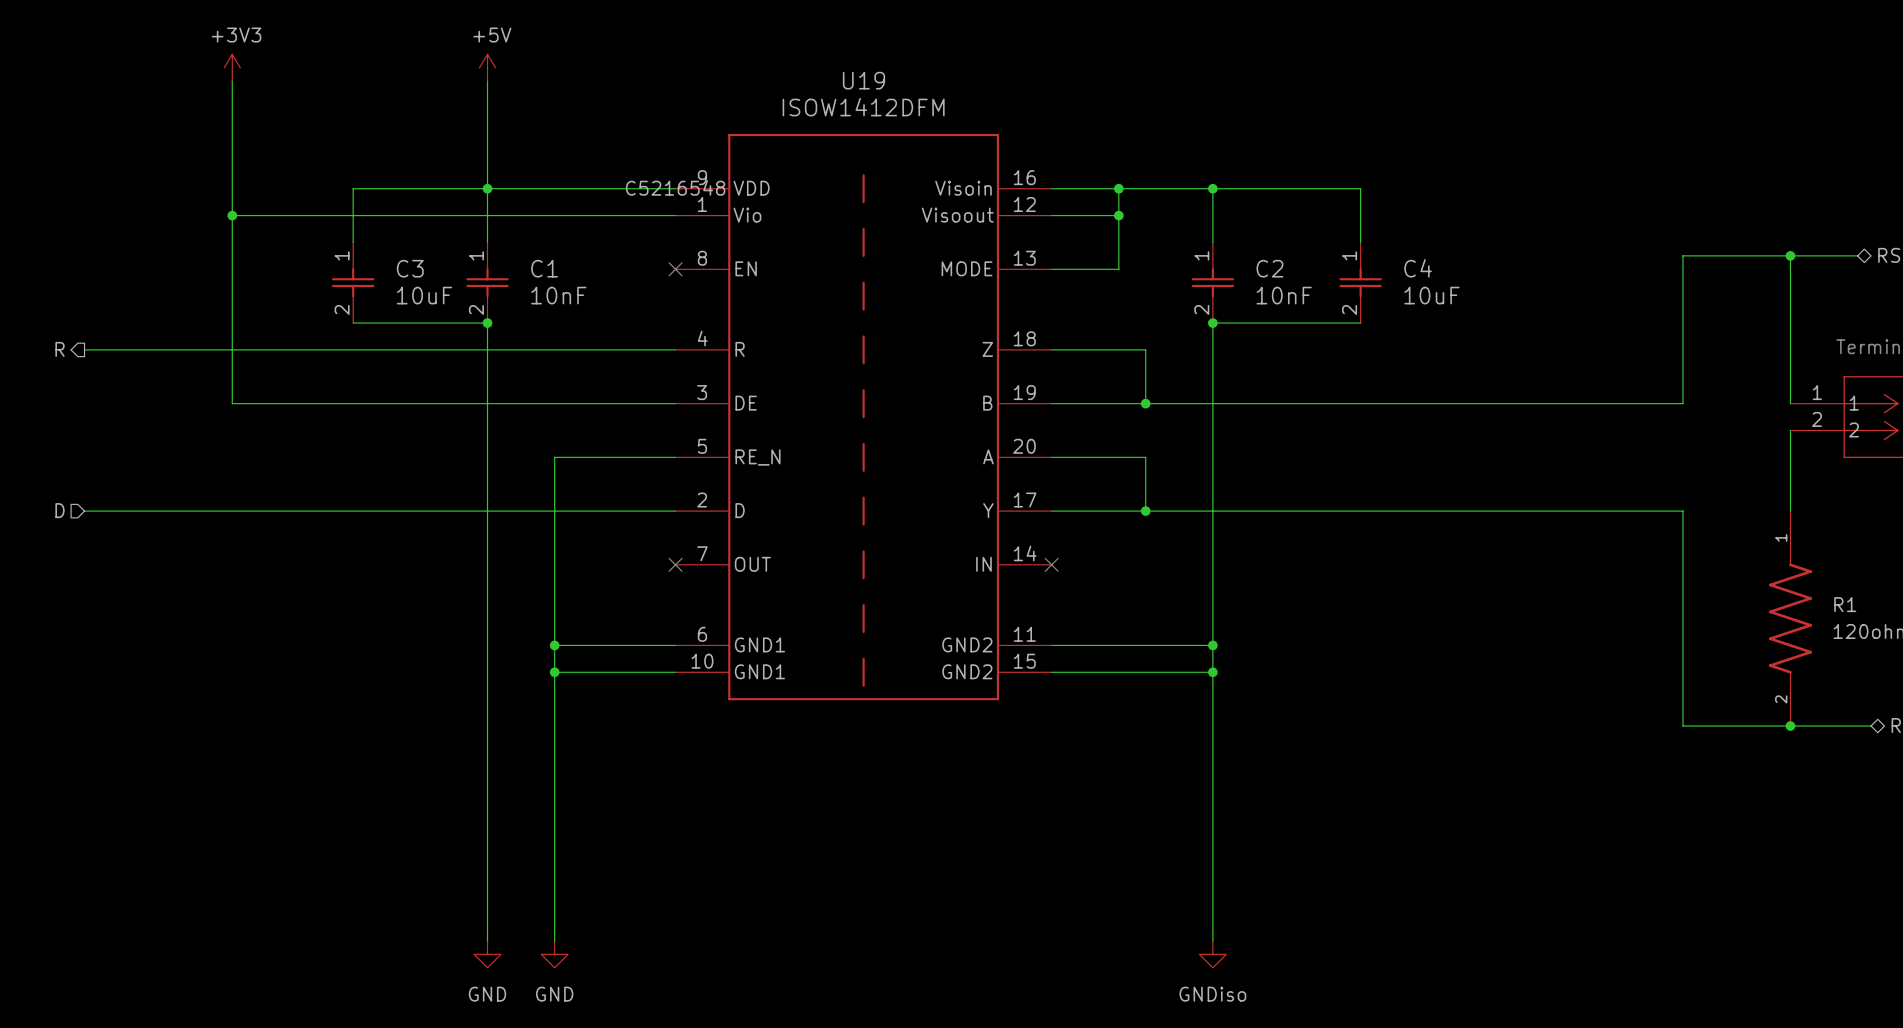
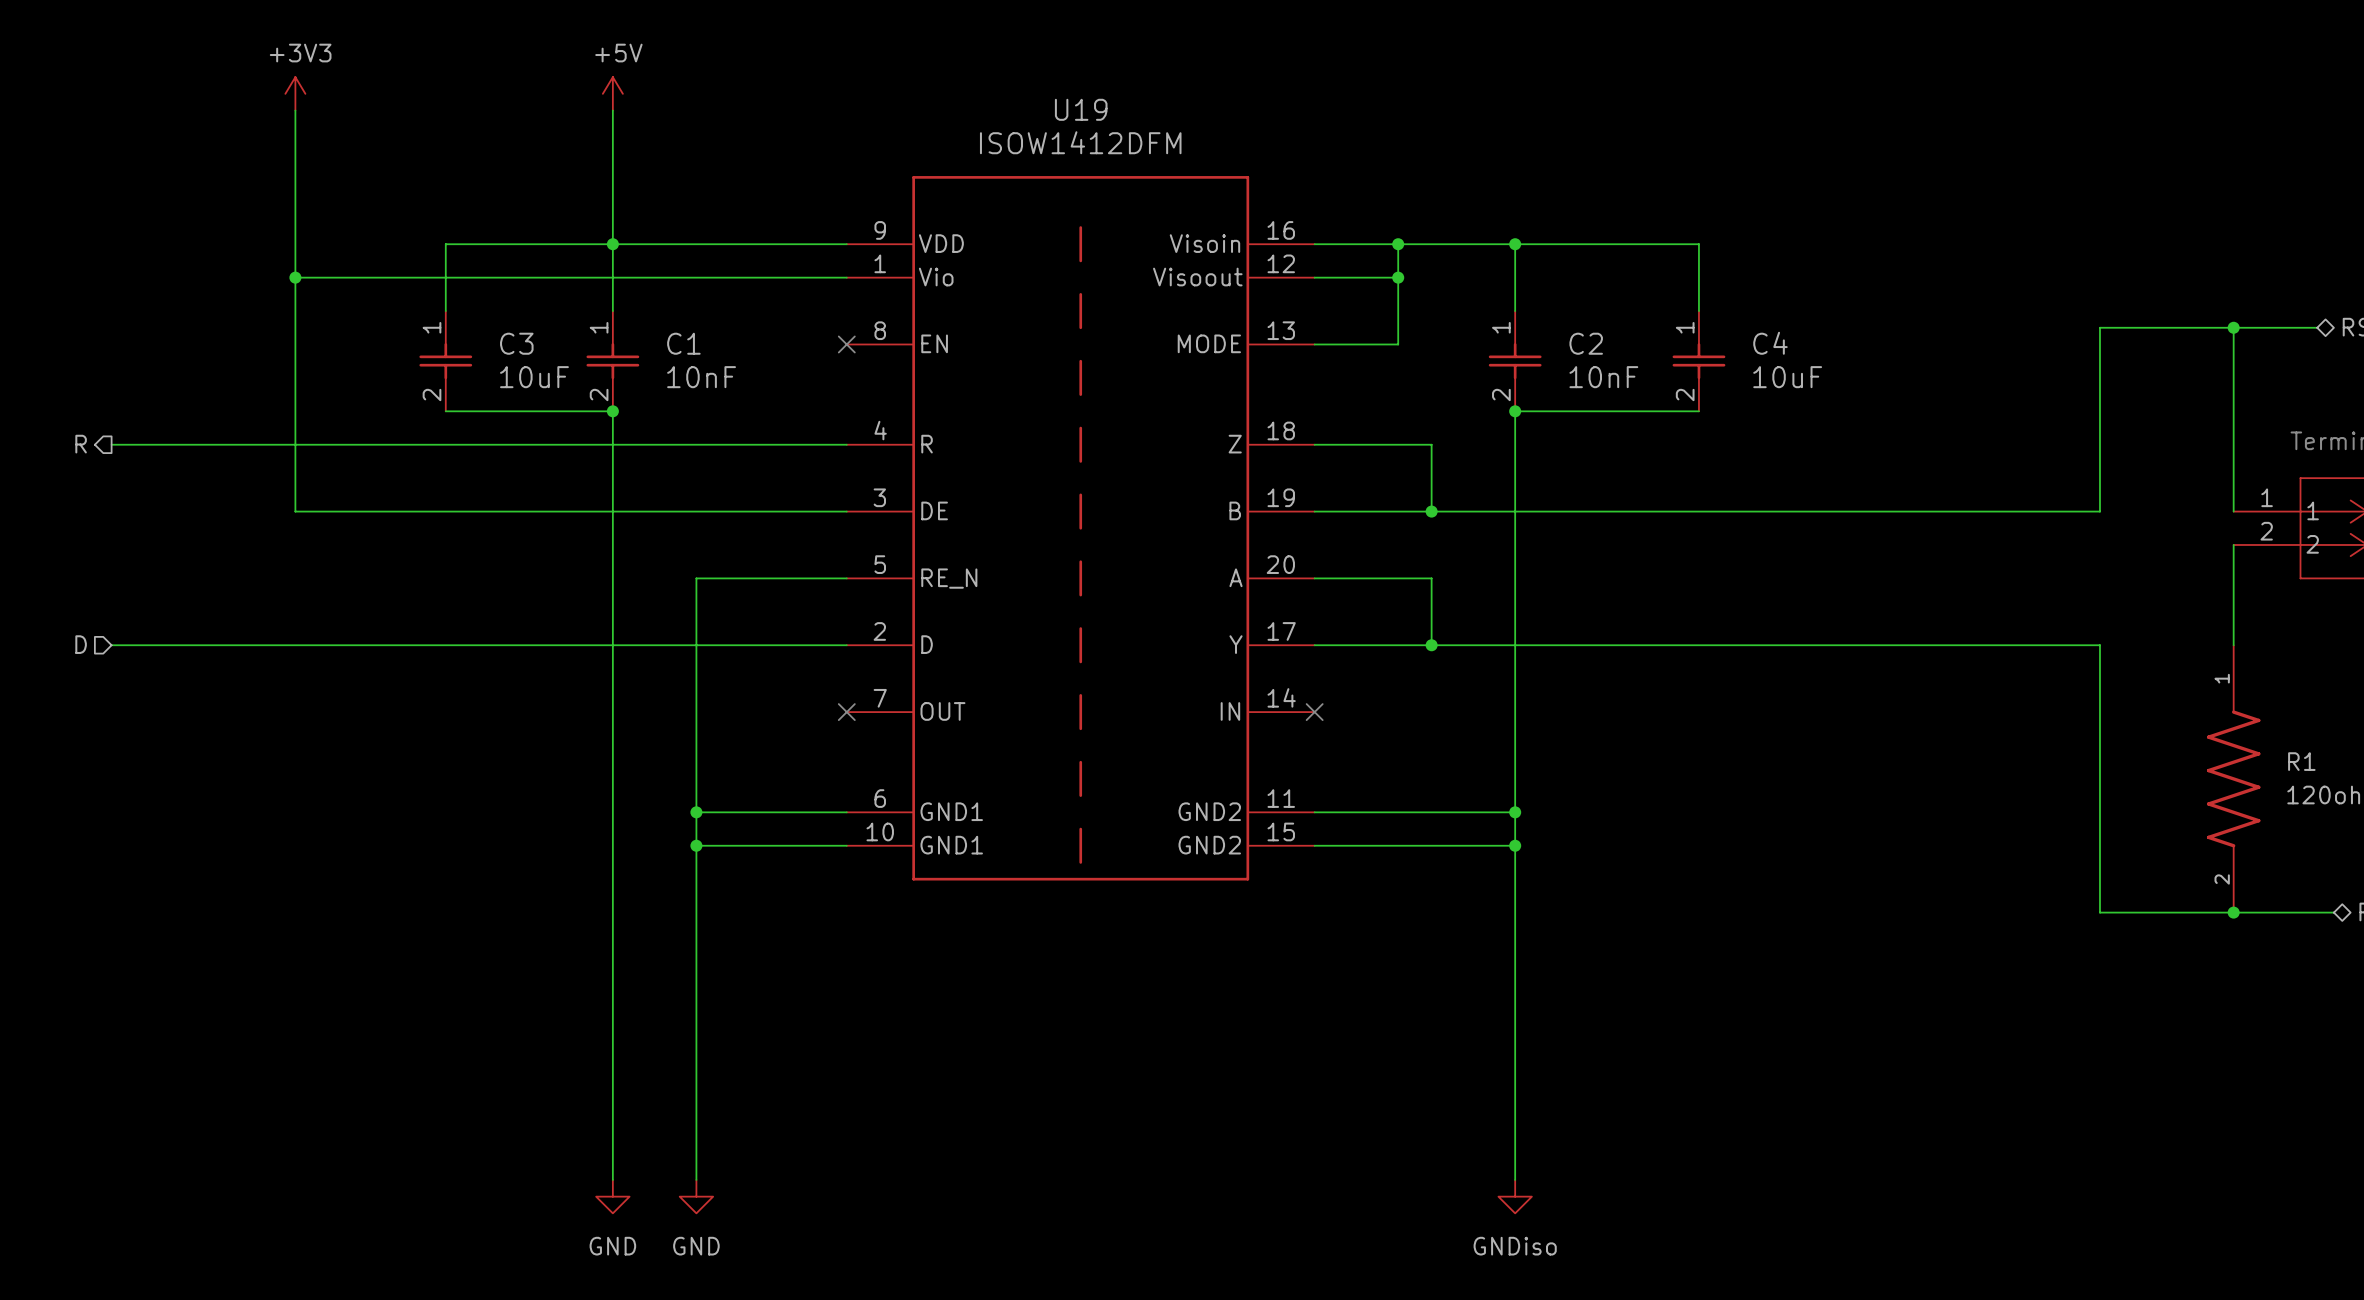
U19 text: C5216548 (675, 187) -> none

